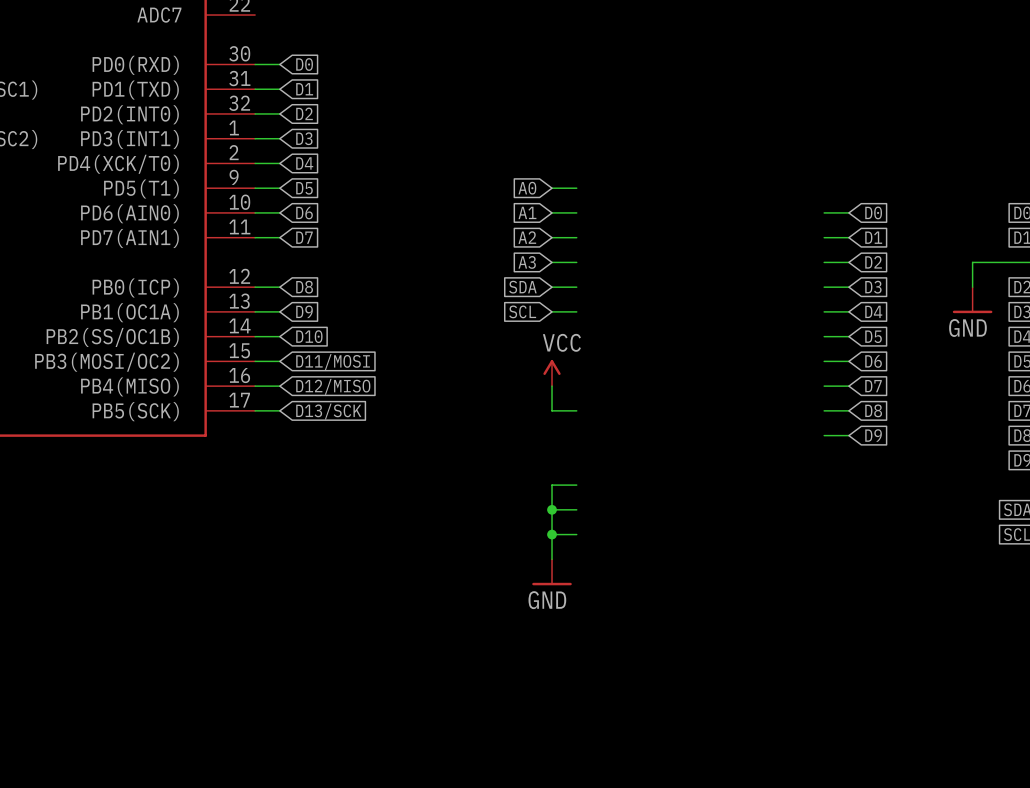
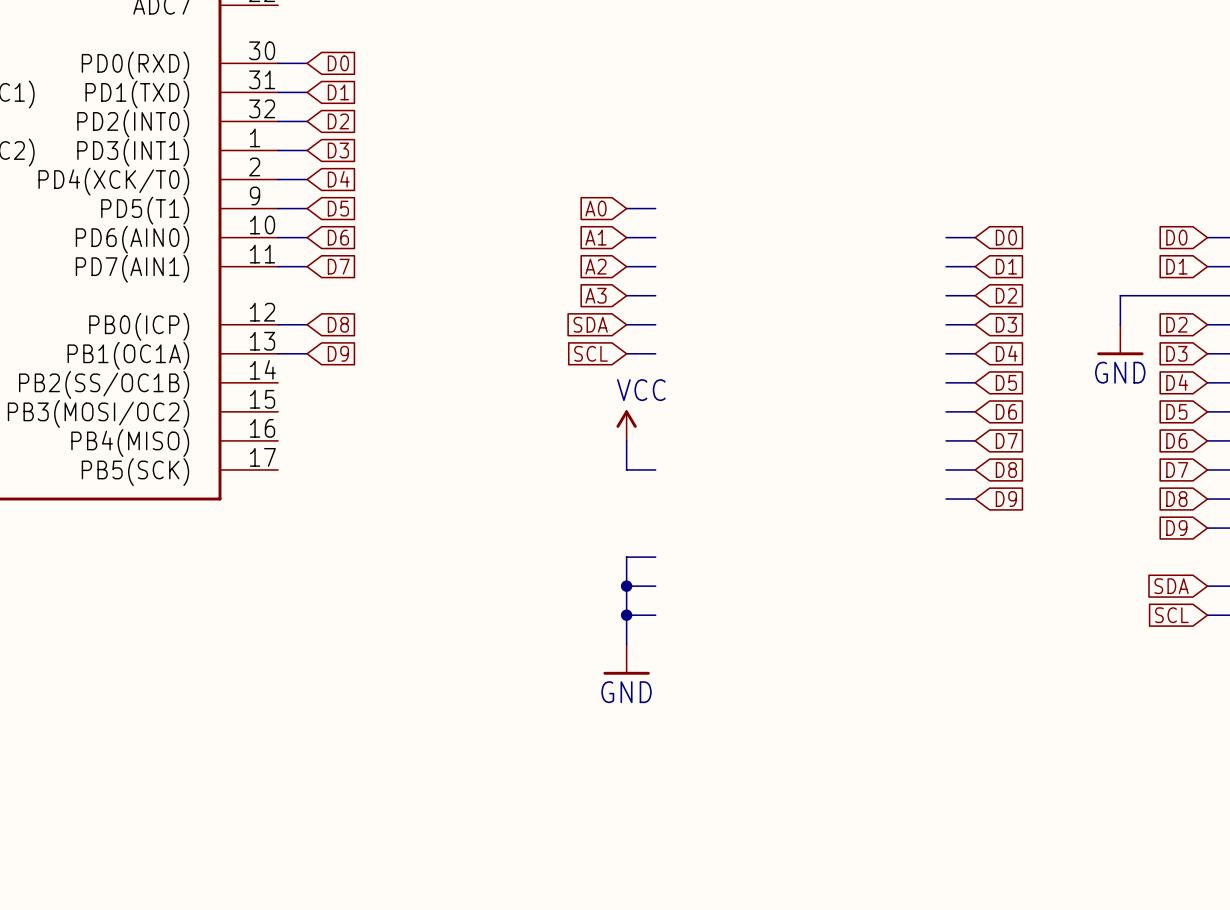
wire: (255, 336) (279, 336) -> none
global label: D10 (309, 336) -> none
wire: (255, 361) (279, 361) -> none
global label: D11/MOSI (333, 362) -> none
wire: (255, 386) (279, 386) -> none
global label: D12/MISO (333, 386) -> none
wire: (255, 410) (279, 410) -> none
global label: D13/SCK (328, 411) -> none

